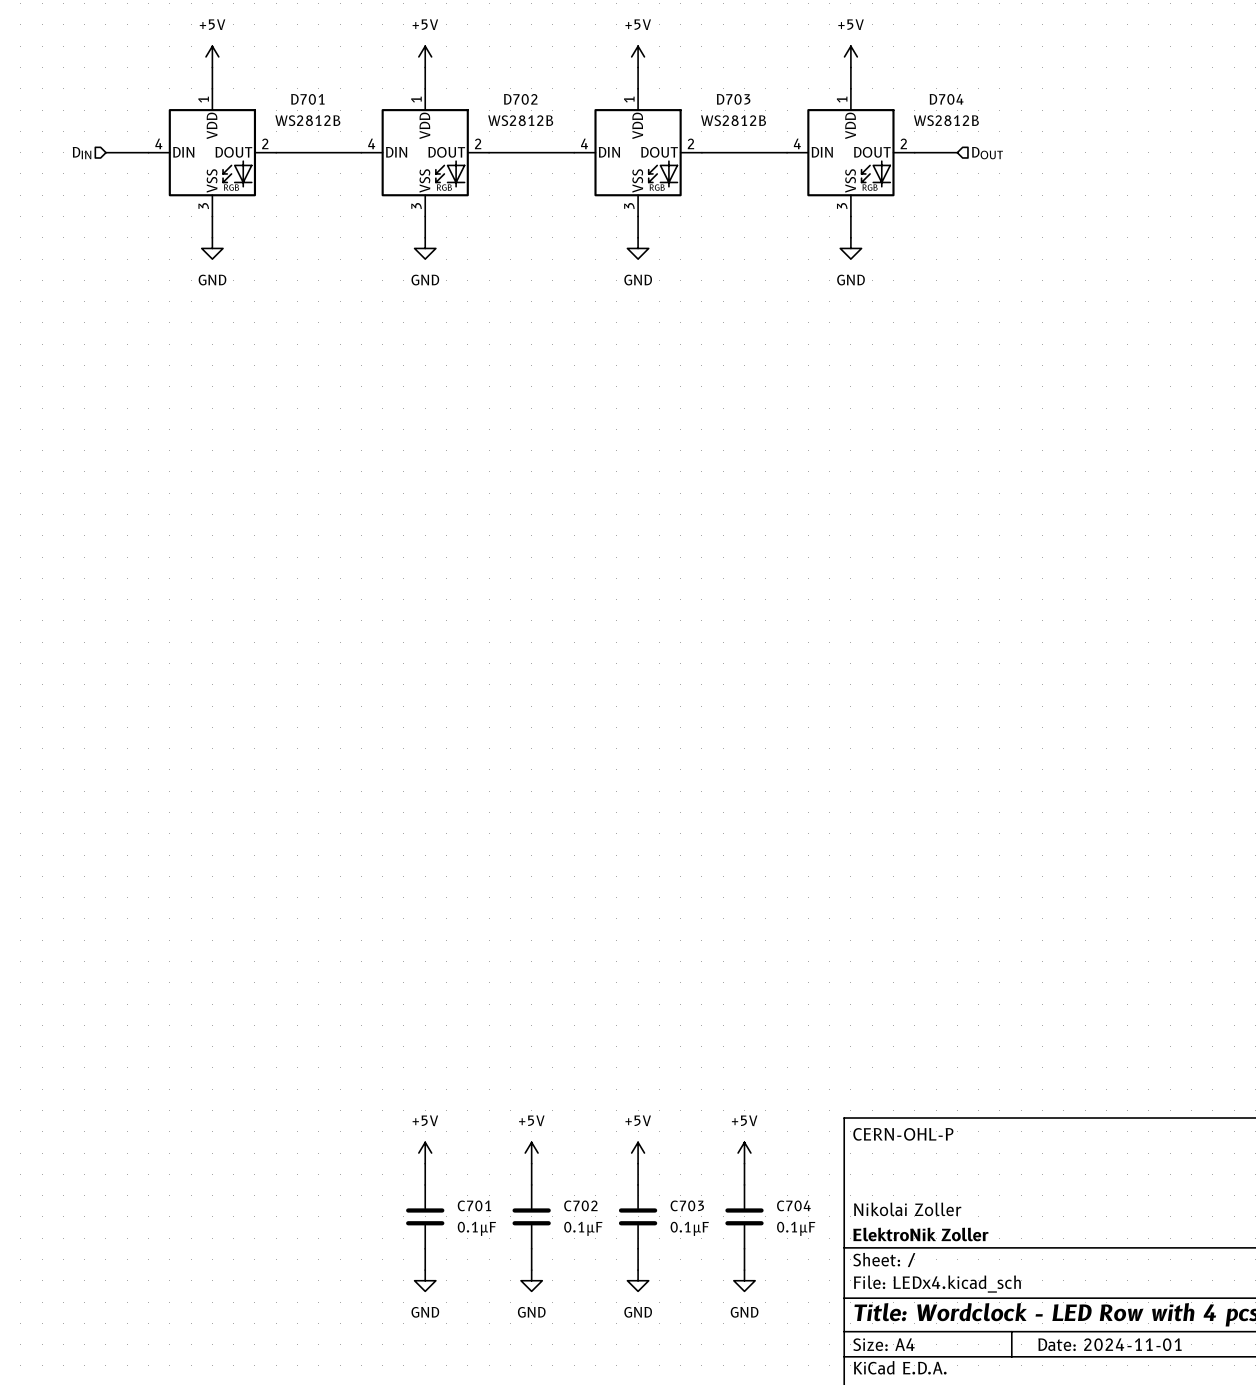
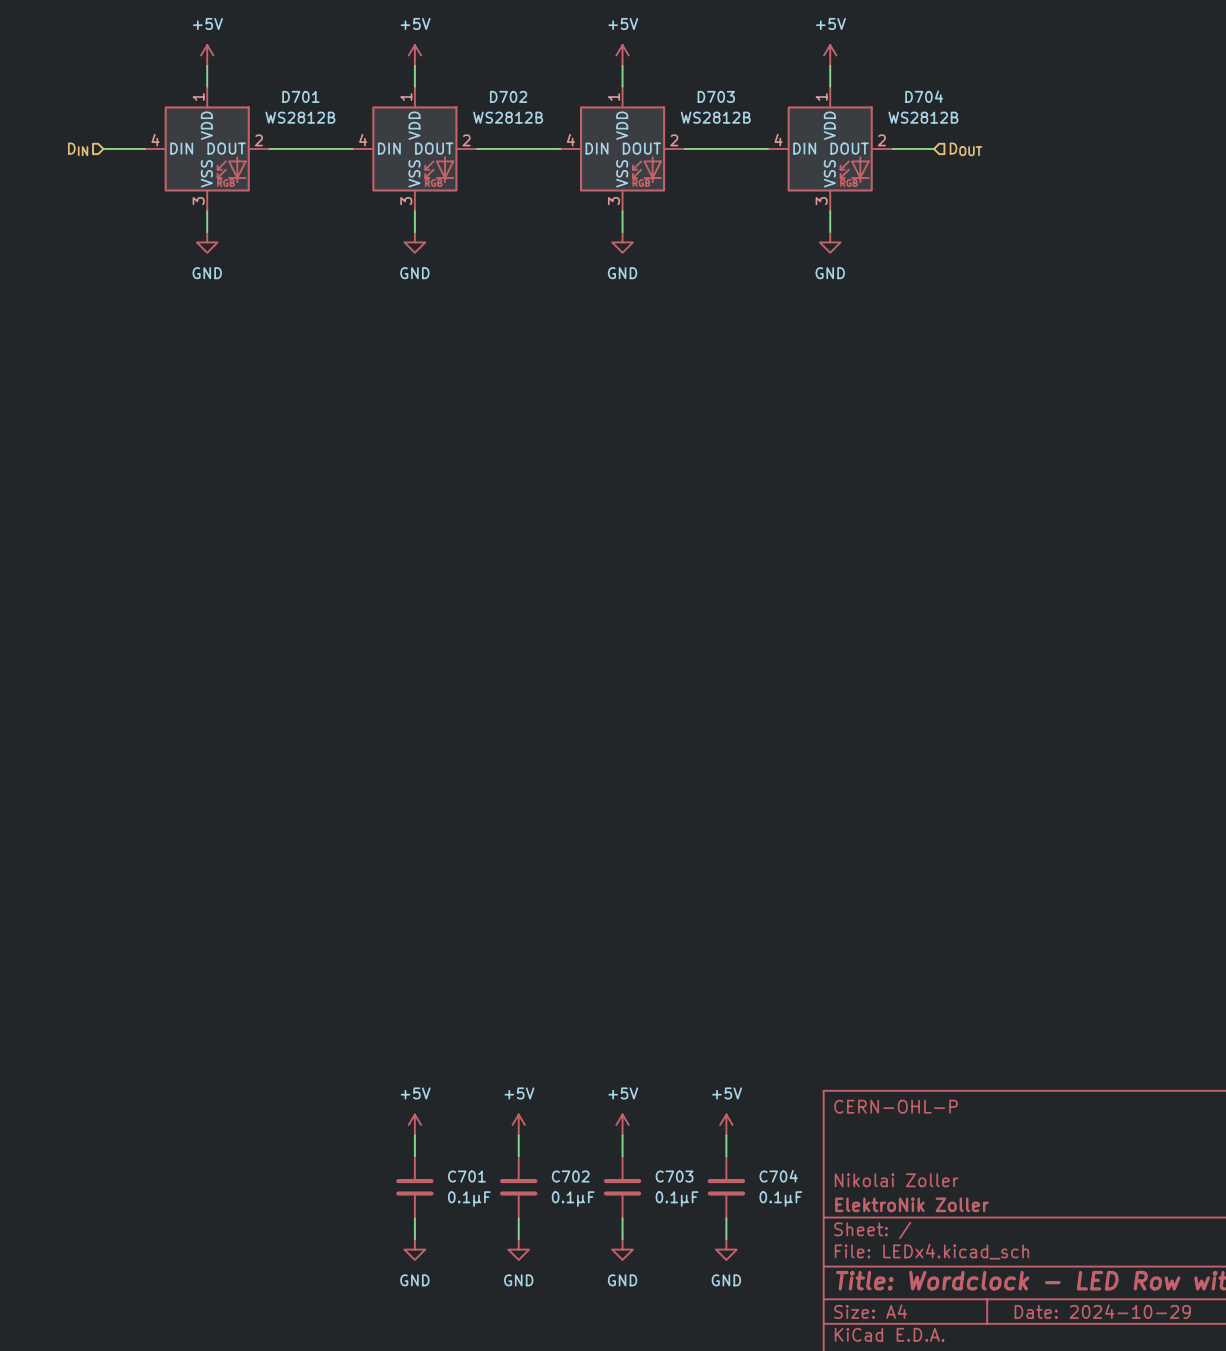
title block: Date: 2024-11-01 (1110, 1344) -> Date: 2024-10-29 (1102, 1311)

